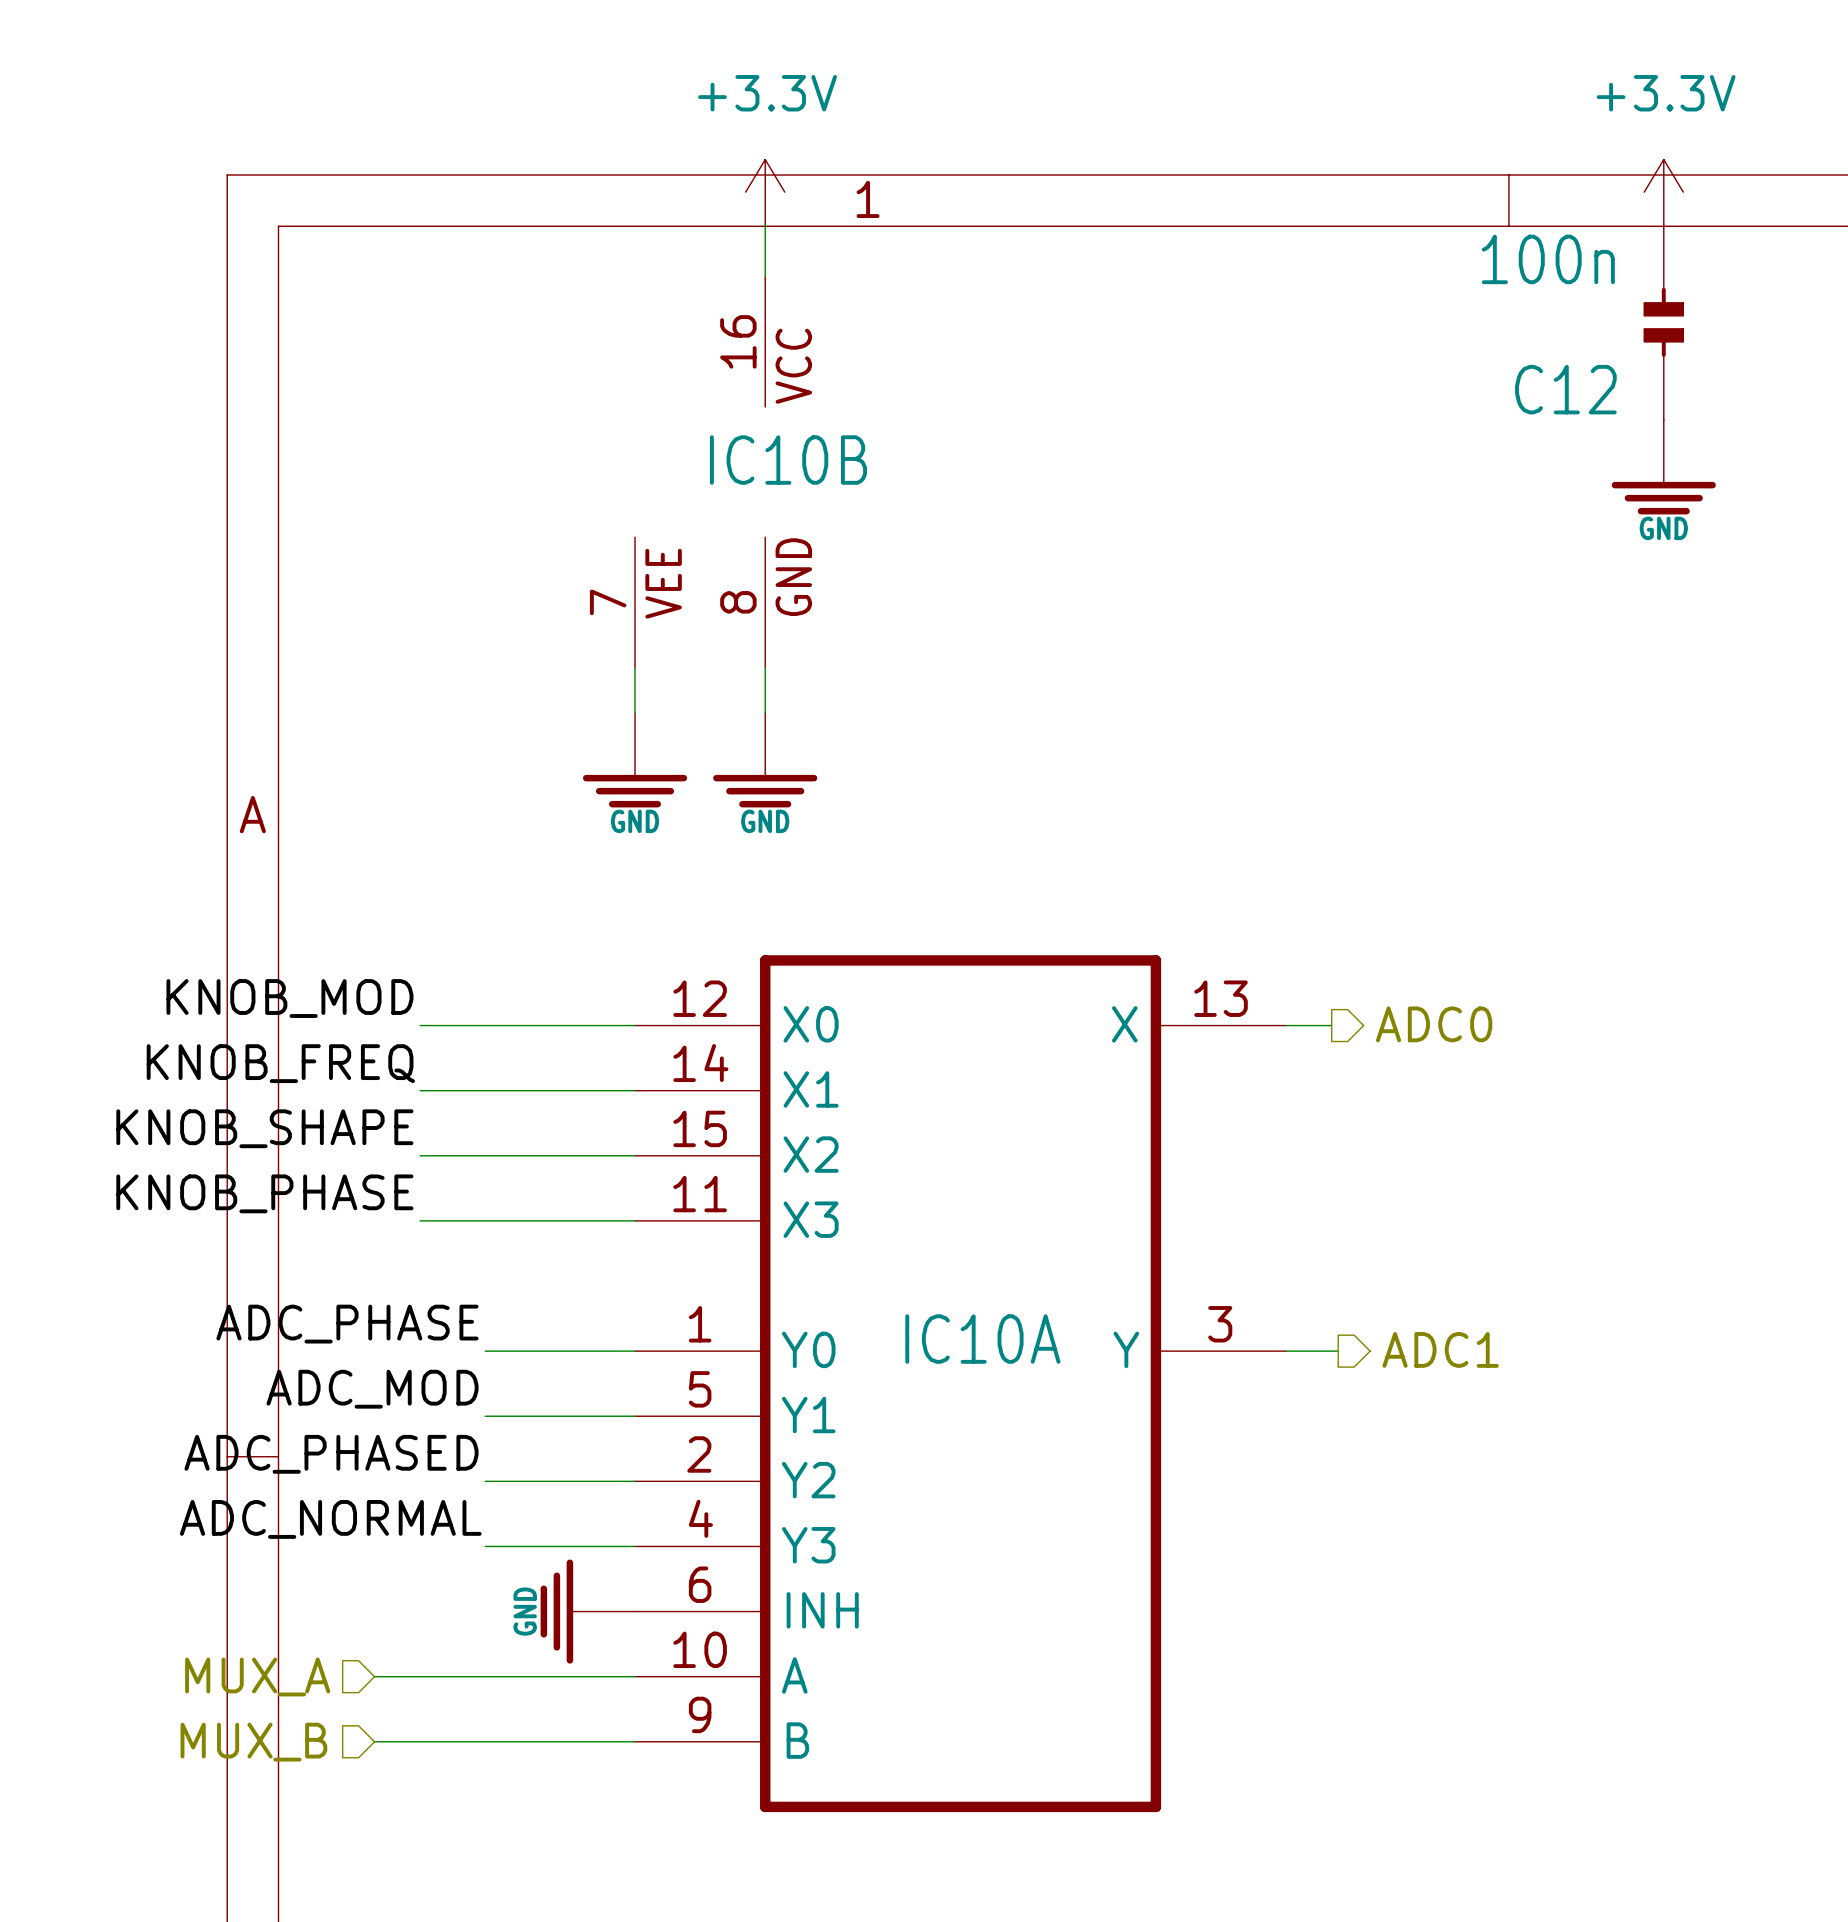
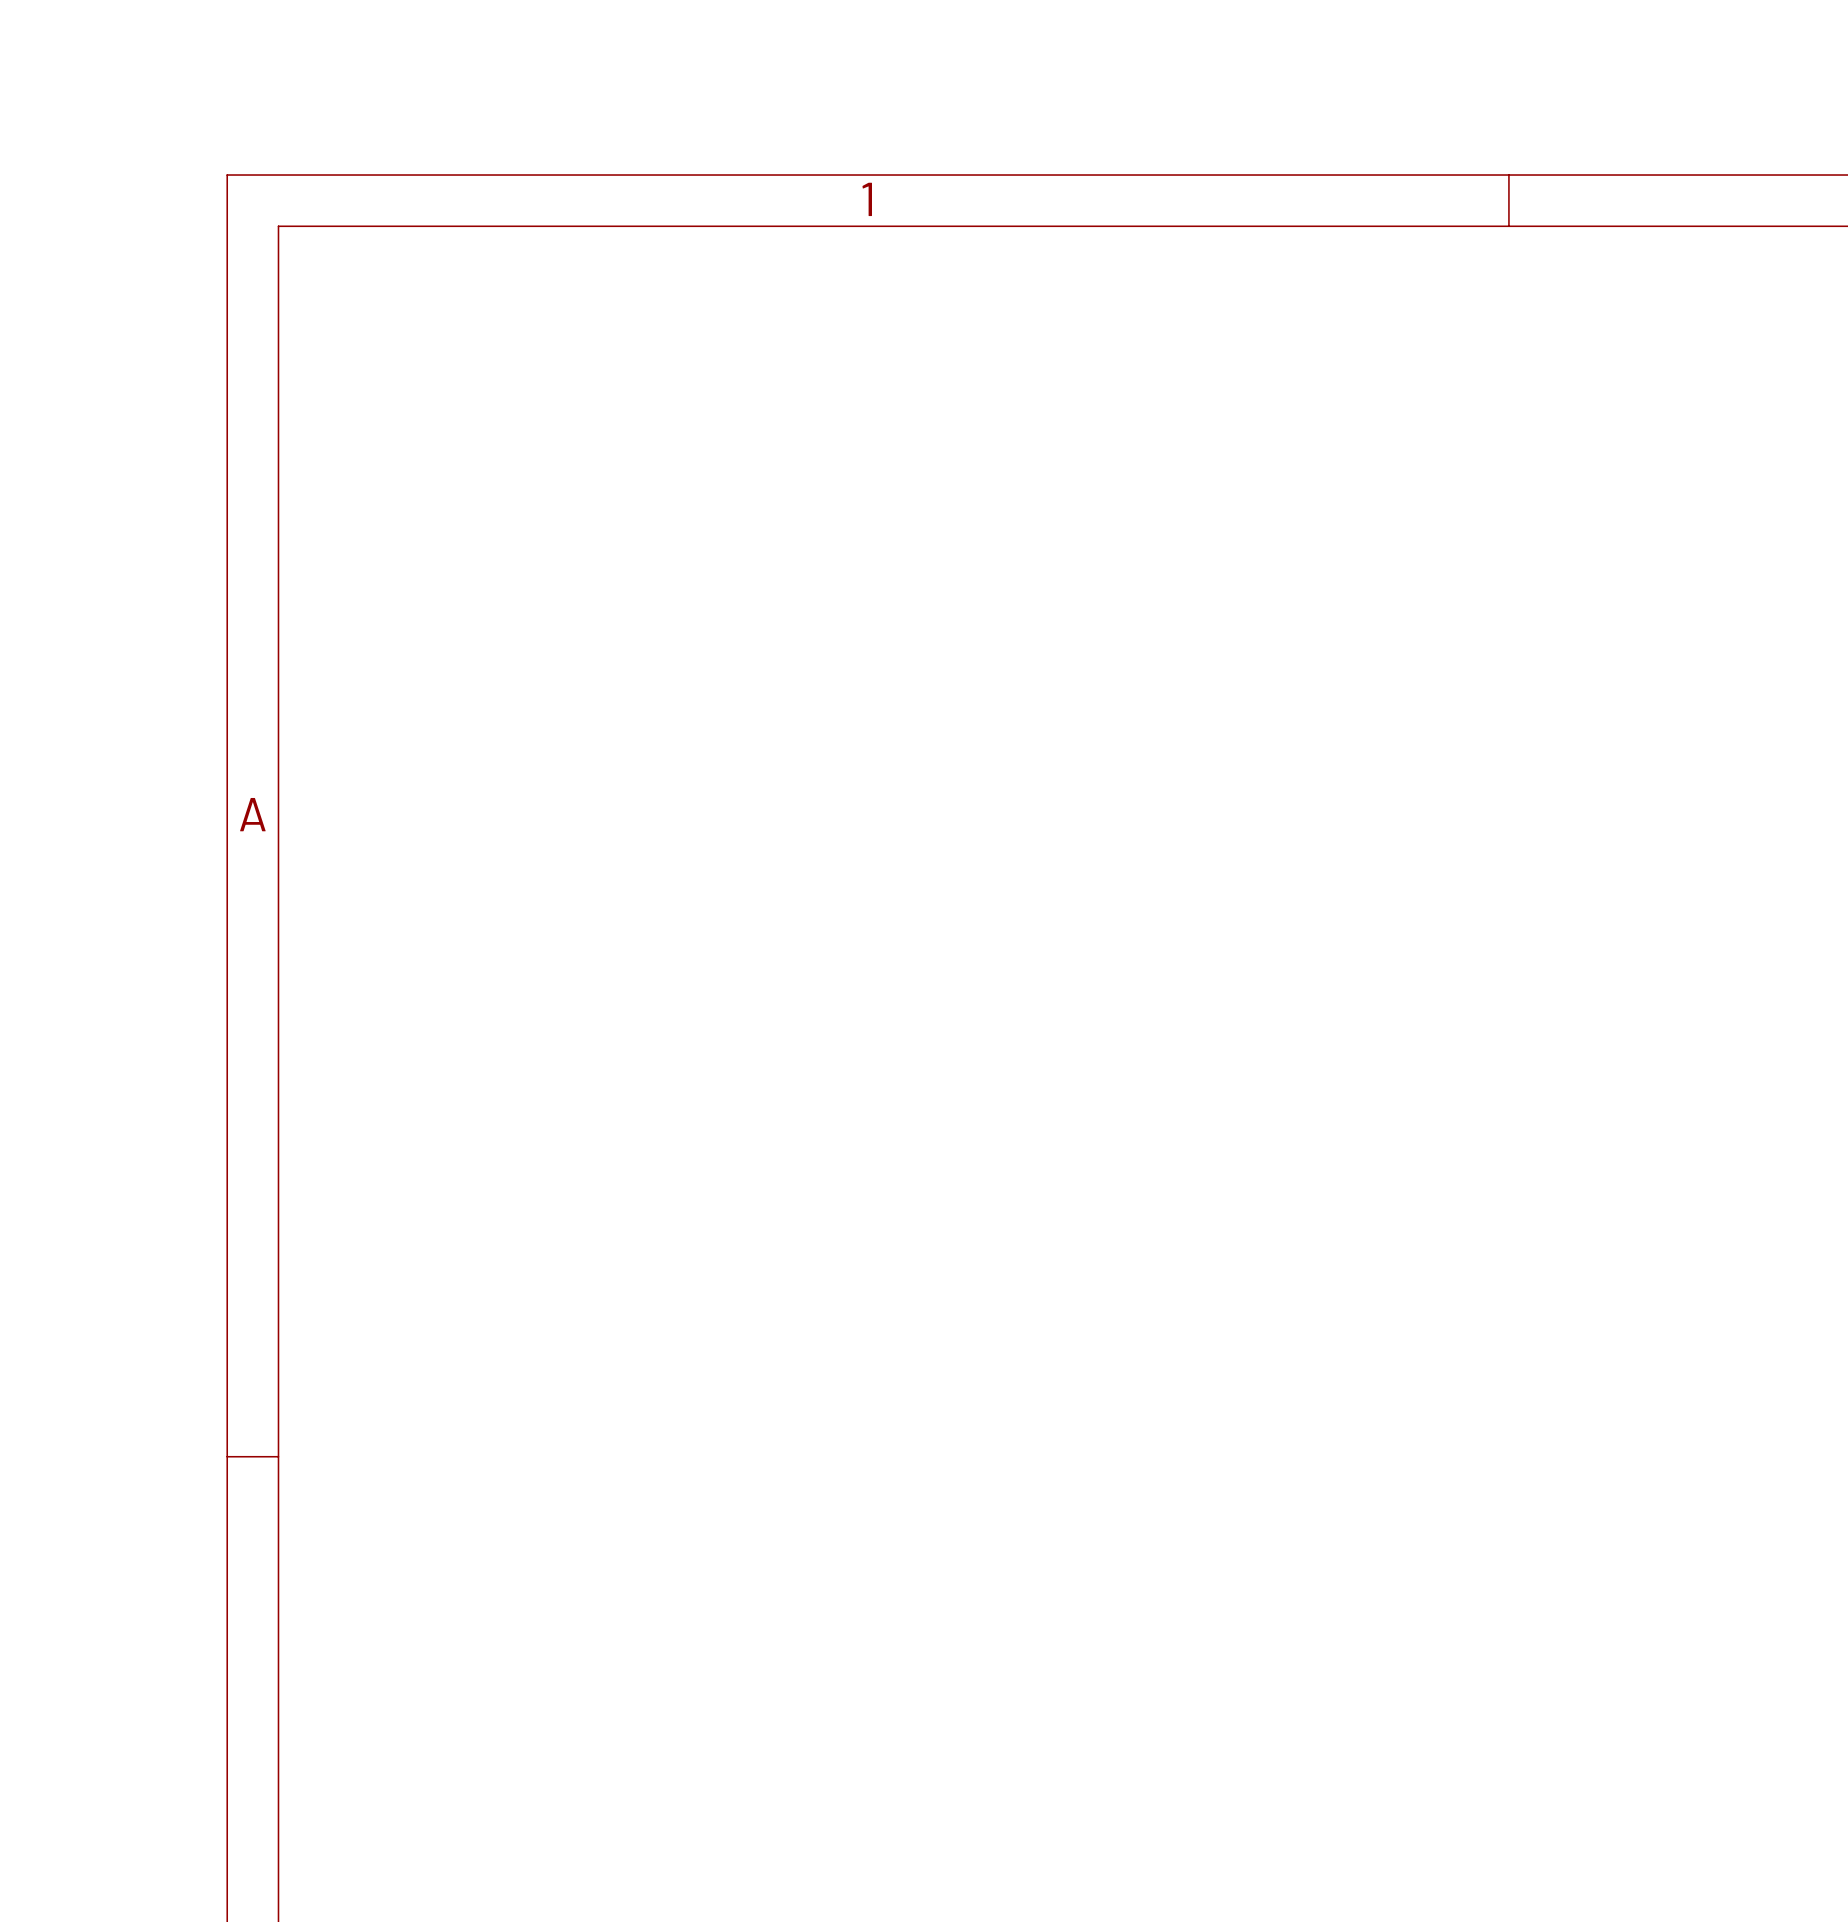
power symbol: +3.3V (765, 192) -> none
power symbol: +3.3V (1663, 192) -> none
wire: (765, 224) (765, 276) -> none
C12: 100n (1663, 322) -> none
power symbol: GND (1663, 467) -> none
IC10B: (700, 472) -> none
wire: (635, 667) (635, 713) -> none
wire: (765, 667) (765, 713) -> none
power symbol: GND (635, 760) -> none
power symbol: GND (765, 760) -> none
label: KNOB_MOD (289, 998) -> none
hierarchical label: ADC0 (1434, 1024) -> none
wire: (420, 1025) (635, 1025) -> none
wire: (1286, 1025) (1331, 1025) -> none
label: KNOB_FREQ (280, 1063) -> none
wire: (420, 1090) (635, 1090) -> none
label: KNOB_SHAPE (264, 1128) -> none
wire: (420, 1155) (635, 1155) -> none
label: KNOB_PHASE (264, 1193) -> none
wire: (420, 1220) (635, 1220) -> none
label: ADC_PHASE (347, 1324) -> none
hierarchical label: ADC1 (1440, 1349) -> none
wire: (485, 1351) (635, 1351) -> none
wire: (1286, 1351) (1338, 1351) -> none
IC10A: (960, 1383) -> none
label: ADC_MOD (372, 1389) -> none
wire: (485, 1416) (635, 1416) -> none
label: ADC_PHASED (331, 1454) -> none
wire: (485, 1481) (635, 1481) -> none
label: ADC_NORMAL (330, 1519) -> none
wire: (485, 1546) (635, 1546) -> none
power symbol: GND (587, 1611) -> none
wire: (374, 1676) (635, 1676) -> none
hierarchical label: MUX_A (257, 1677) -> none
wire: (374, 1741) (635, 1741) -> none
hierarchical label: MUX_B (253, 1742) -> none

